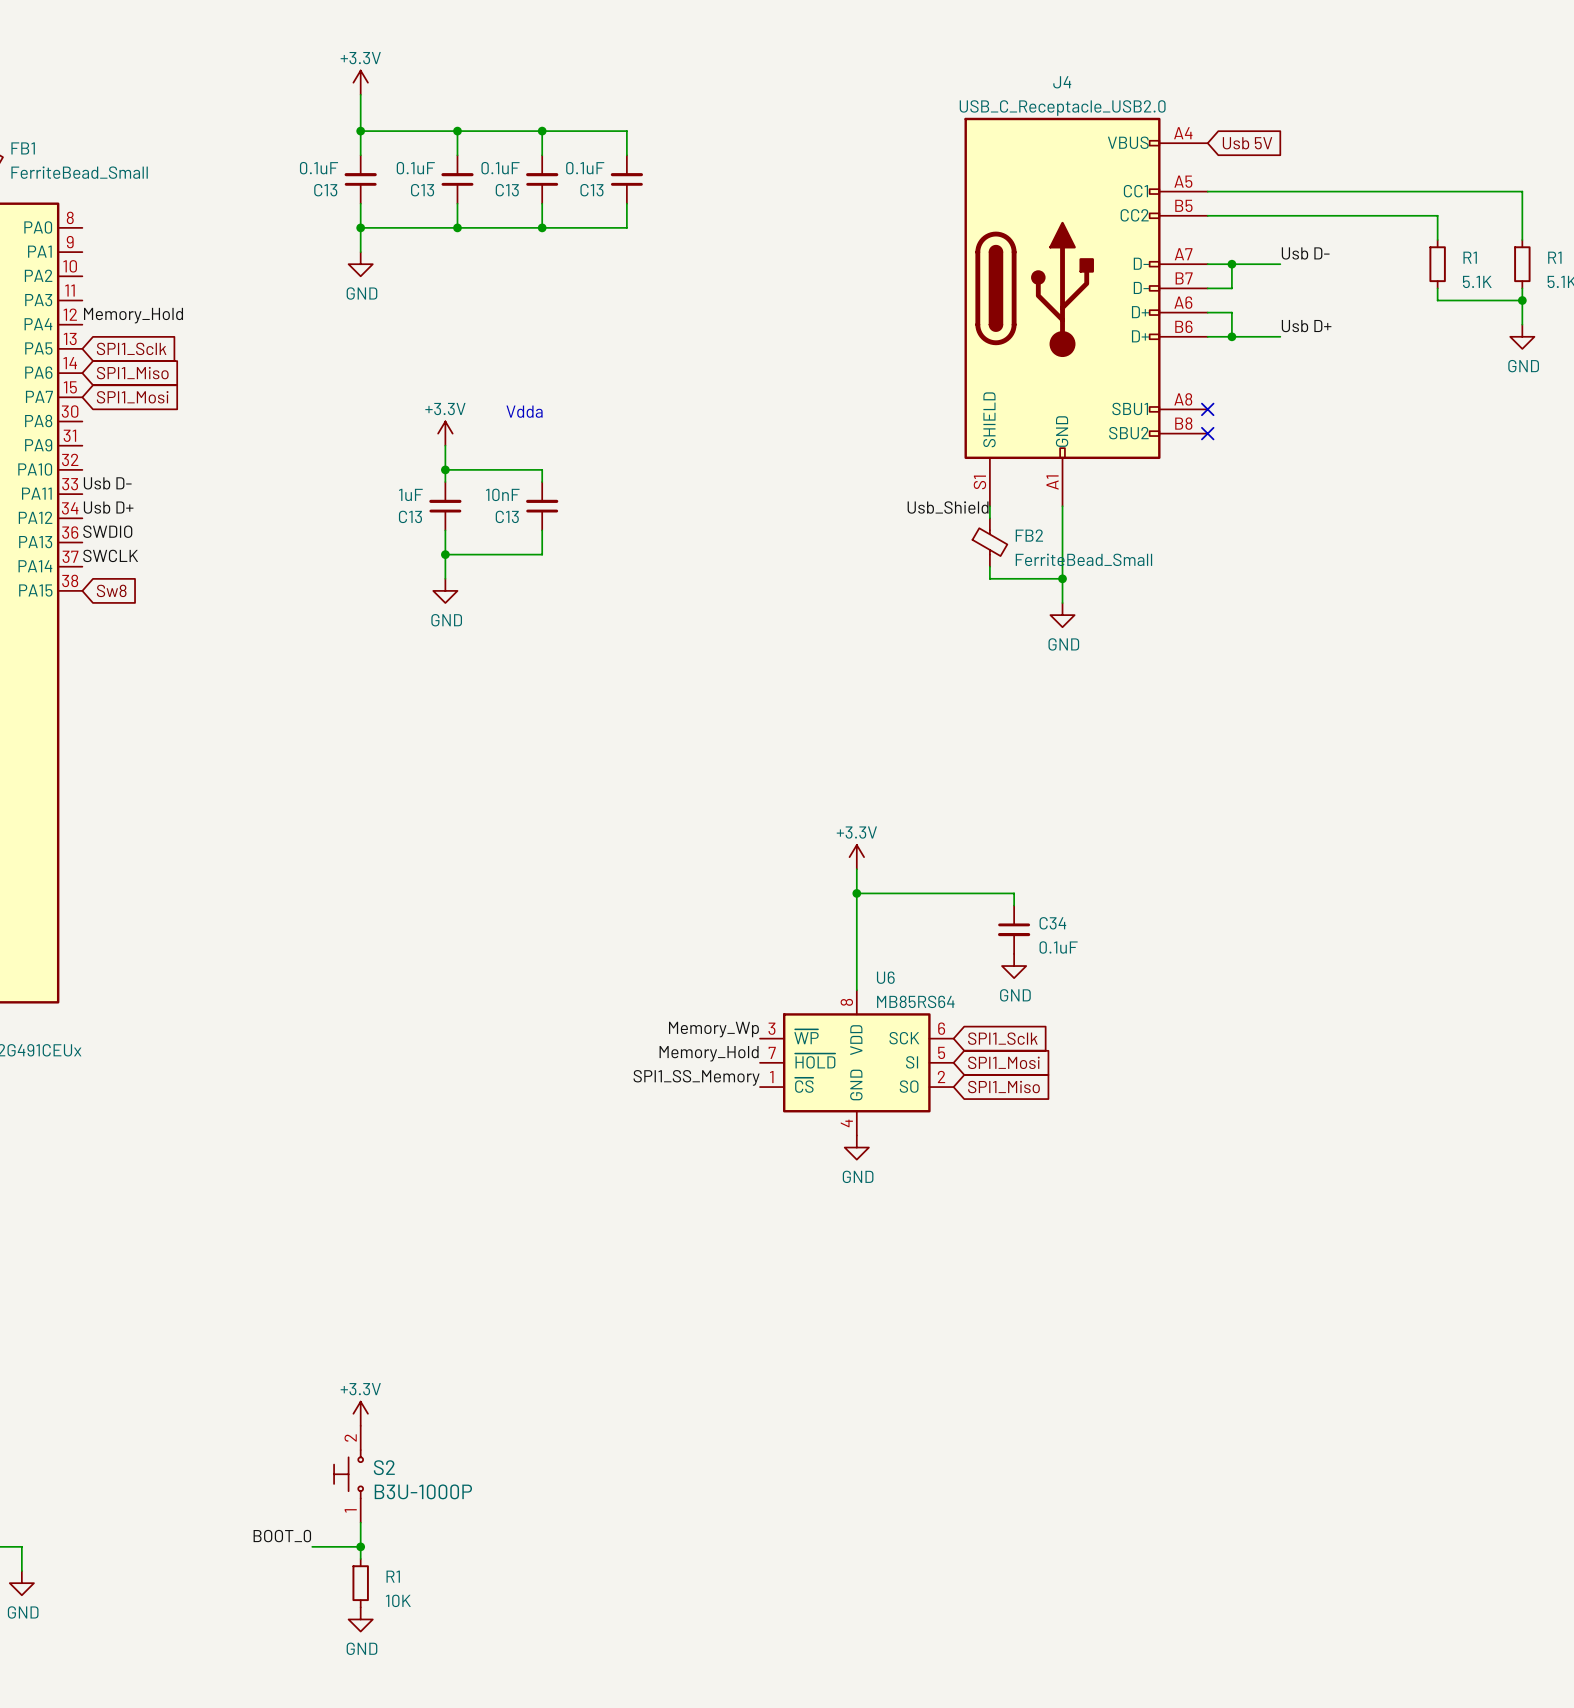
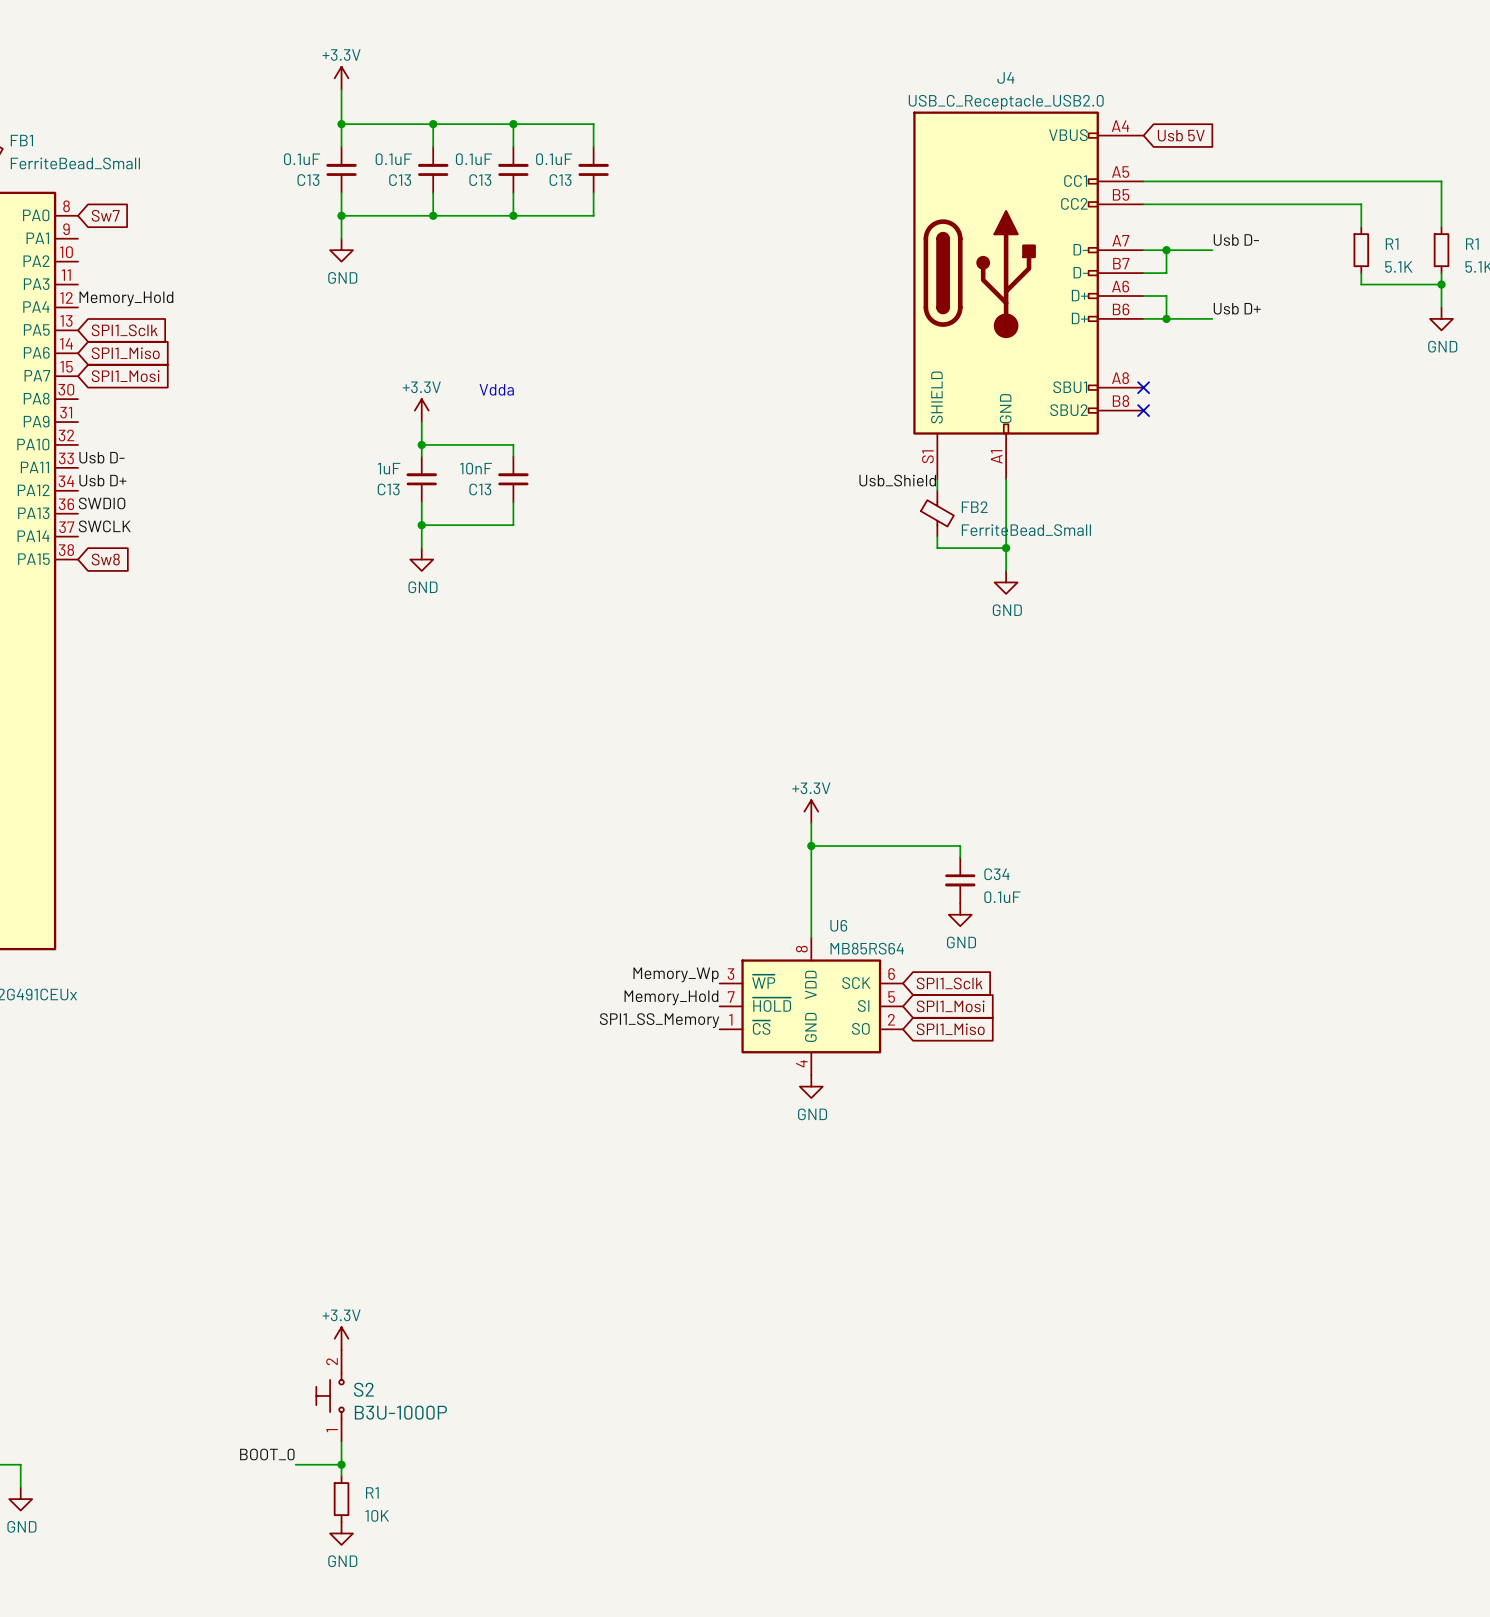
global label: none -> Sw7 (105, 215)

